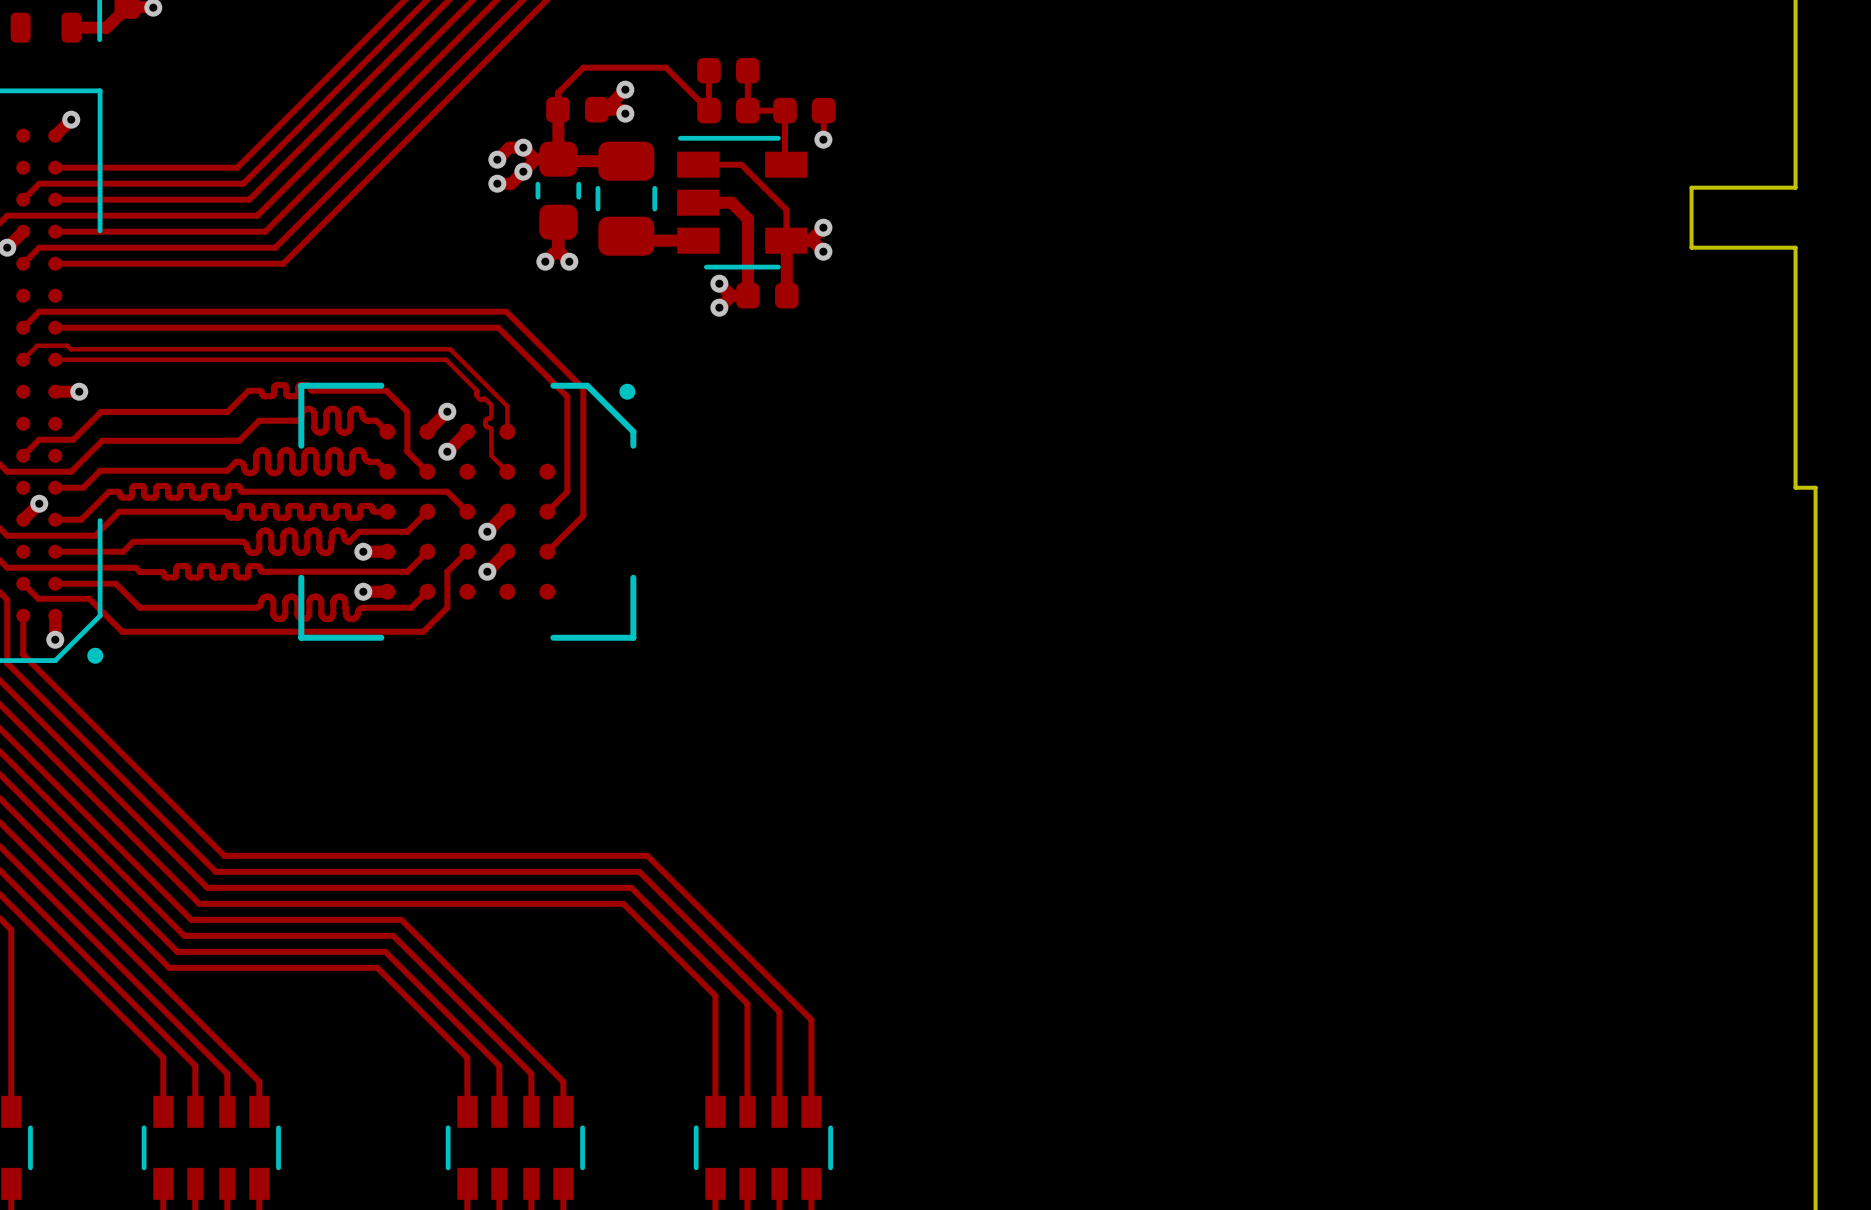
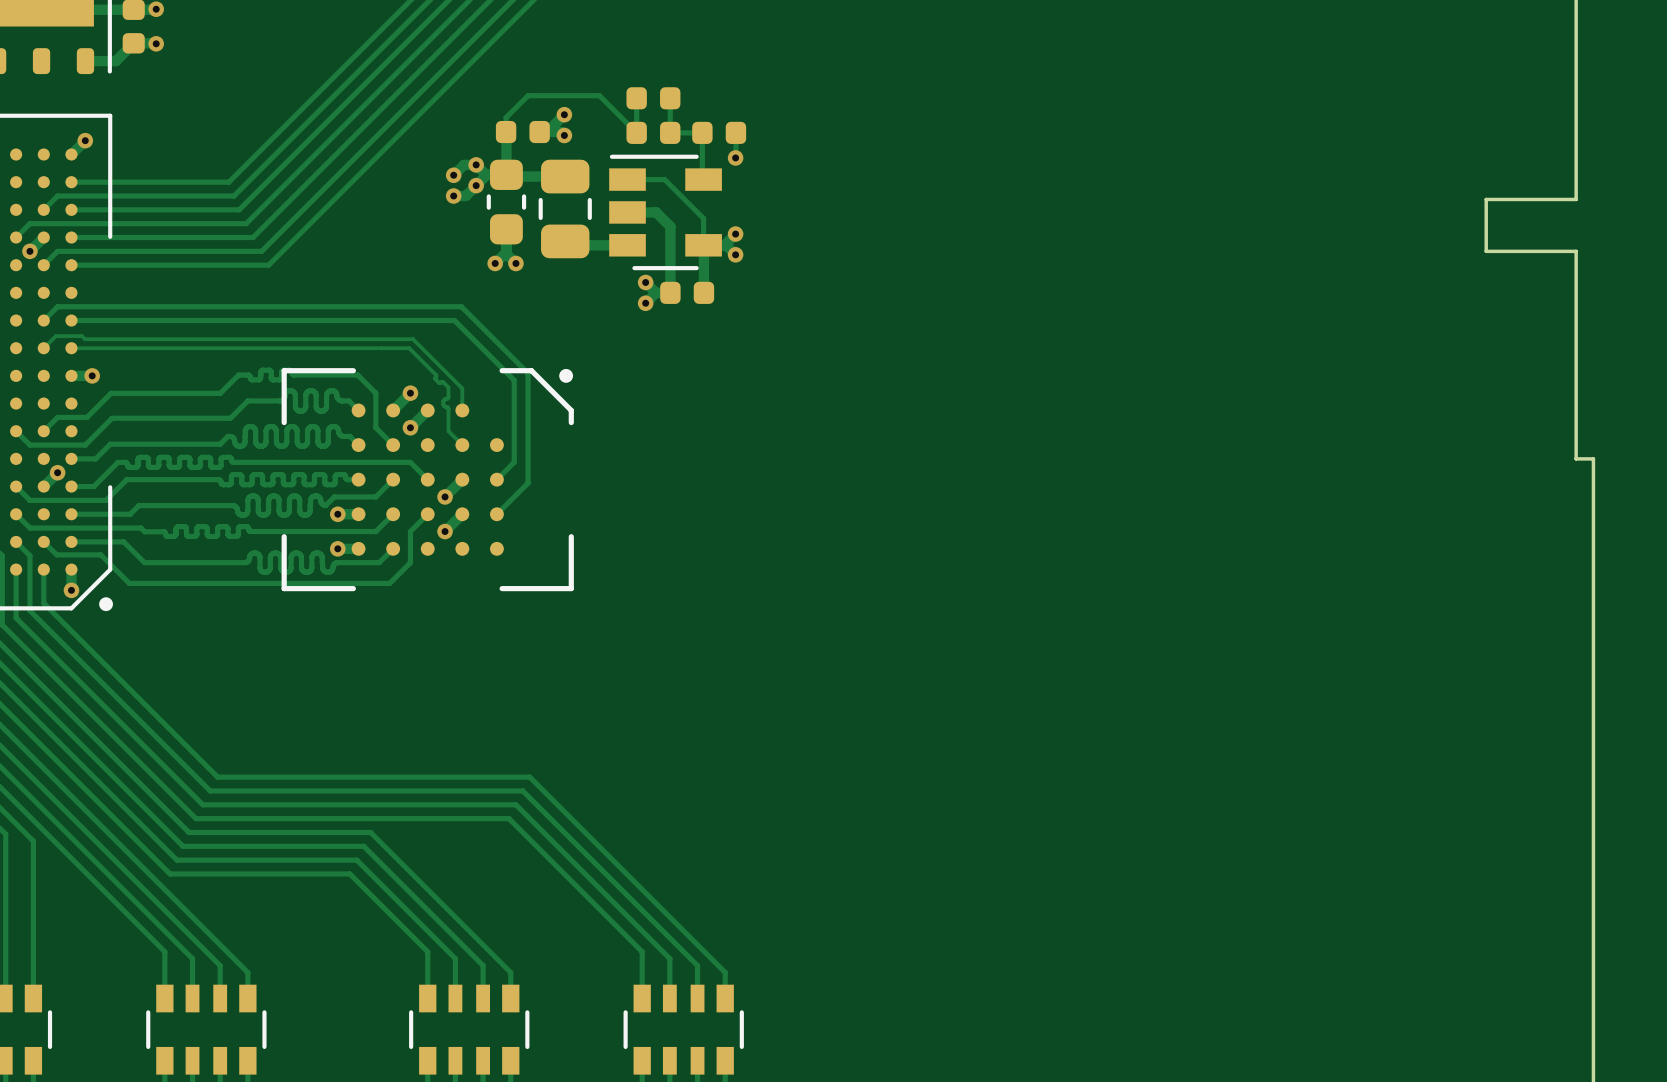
track: (585, 855) (647, 855) (811, 1019) (811, 1081) -> (529, 777) (725, 972)
track: (577, 871) (639, 871) (779, 1011) (779, 1073) -> (522, 790) (697, 965)
track: (569, 887) (631, 887) (747, 1003) (747, 1065) -> (515, 804) (669, 958)
track: (561, 903) (623, 903) (715, 995) (715, 1057) -> (509, 818) (642, 951)

